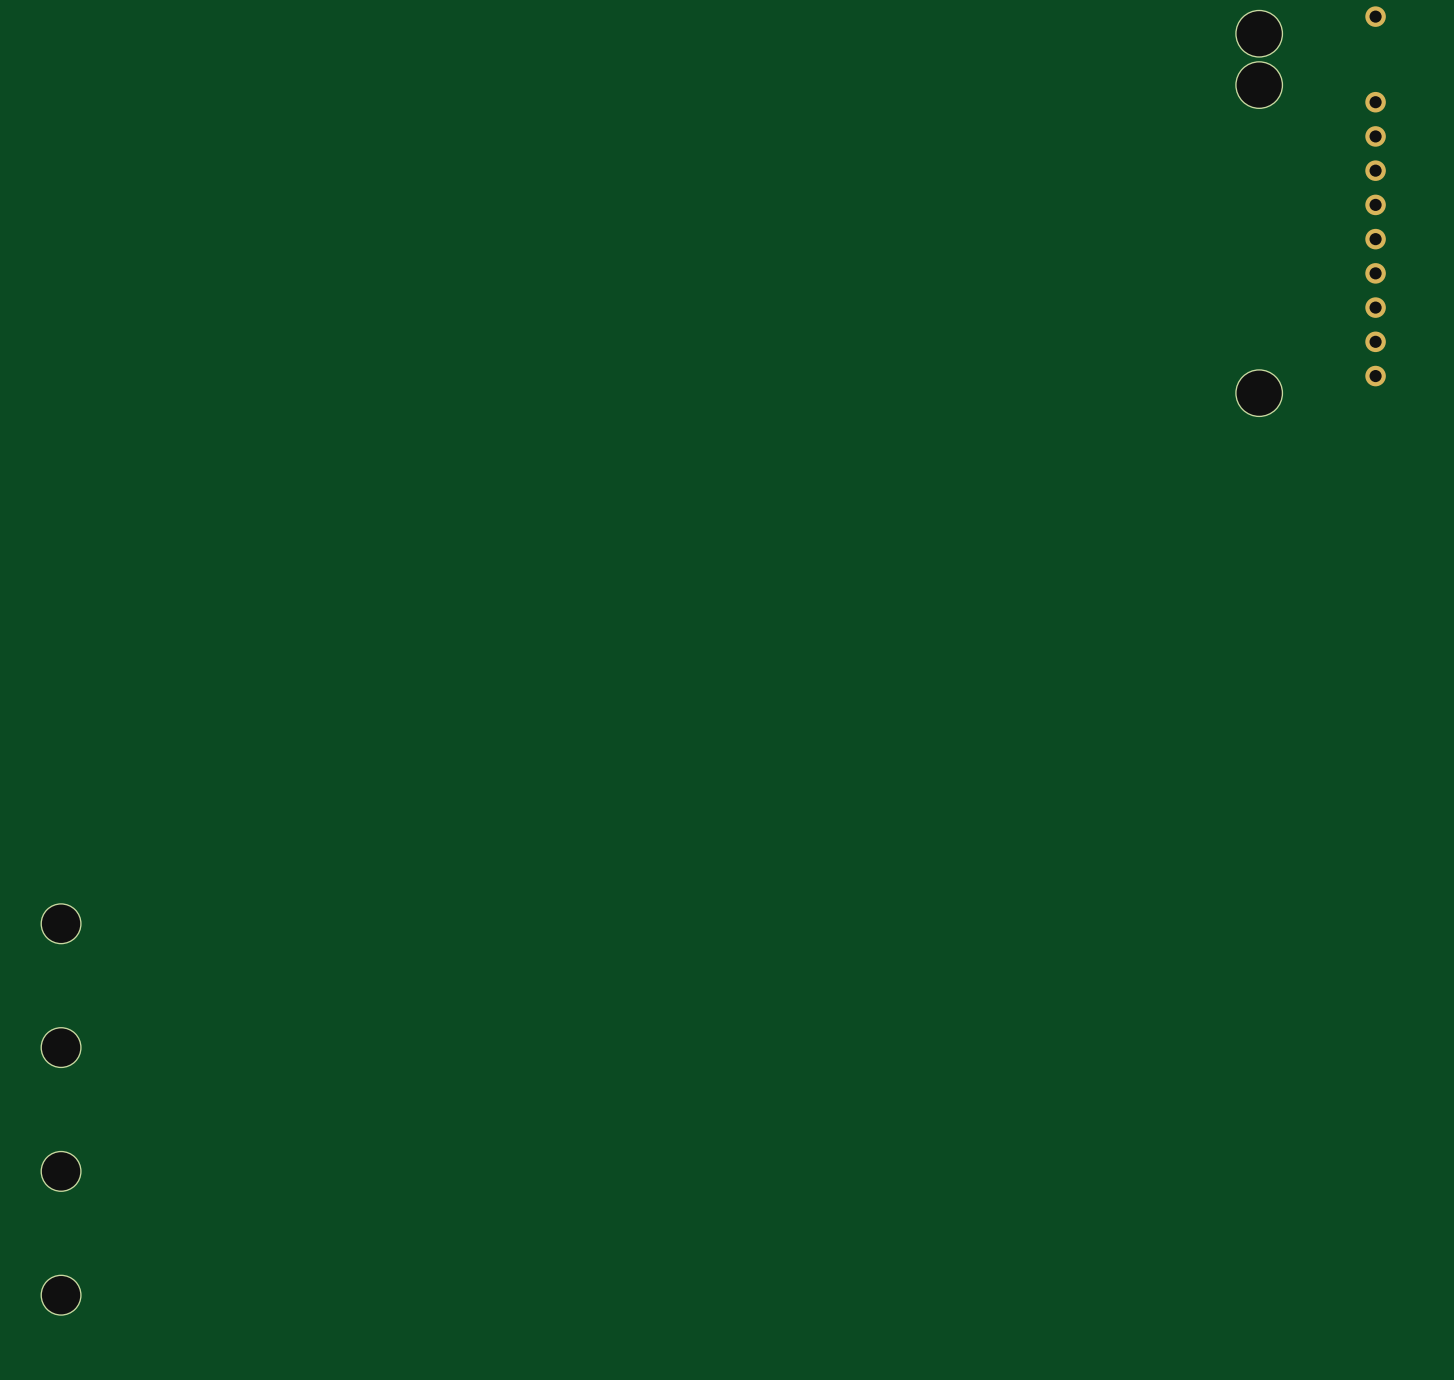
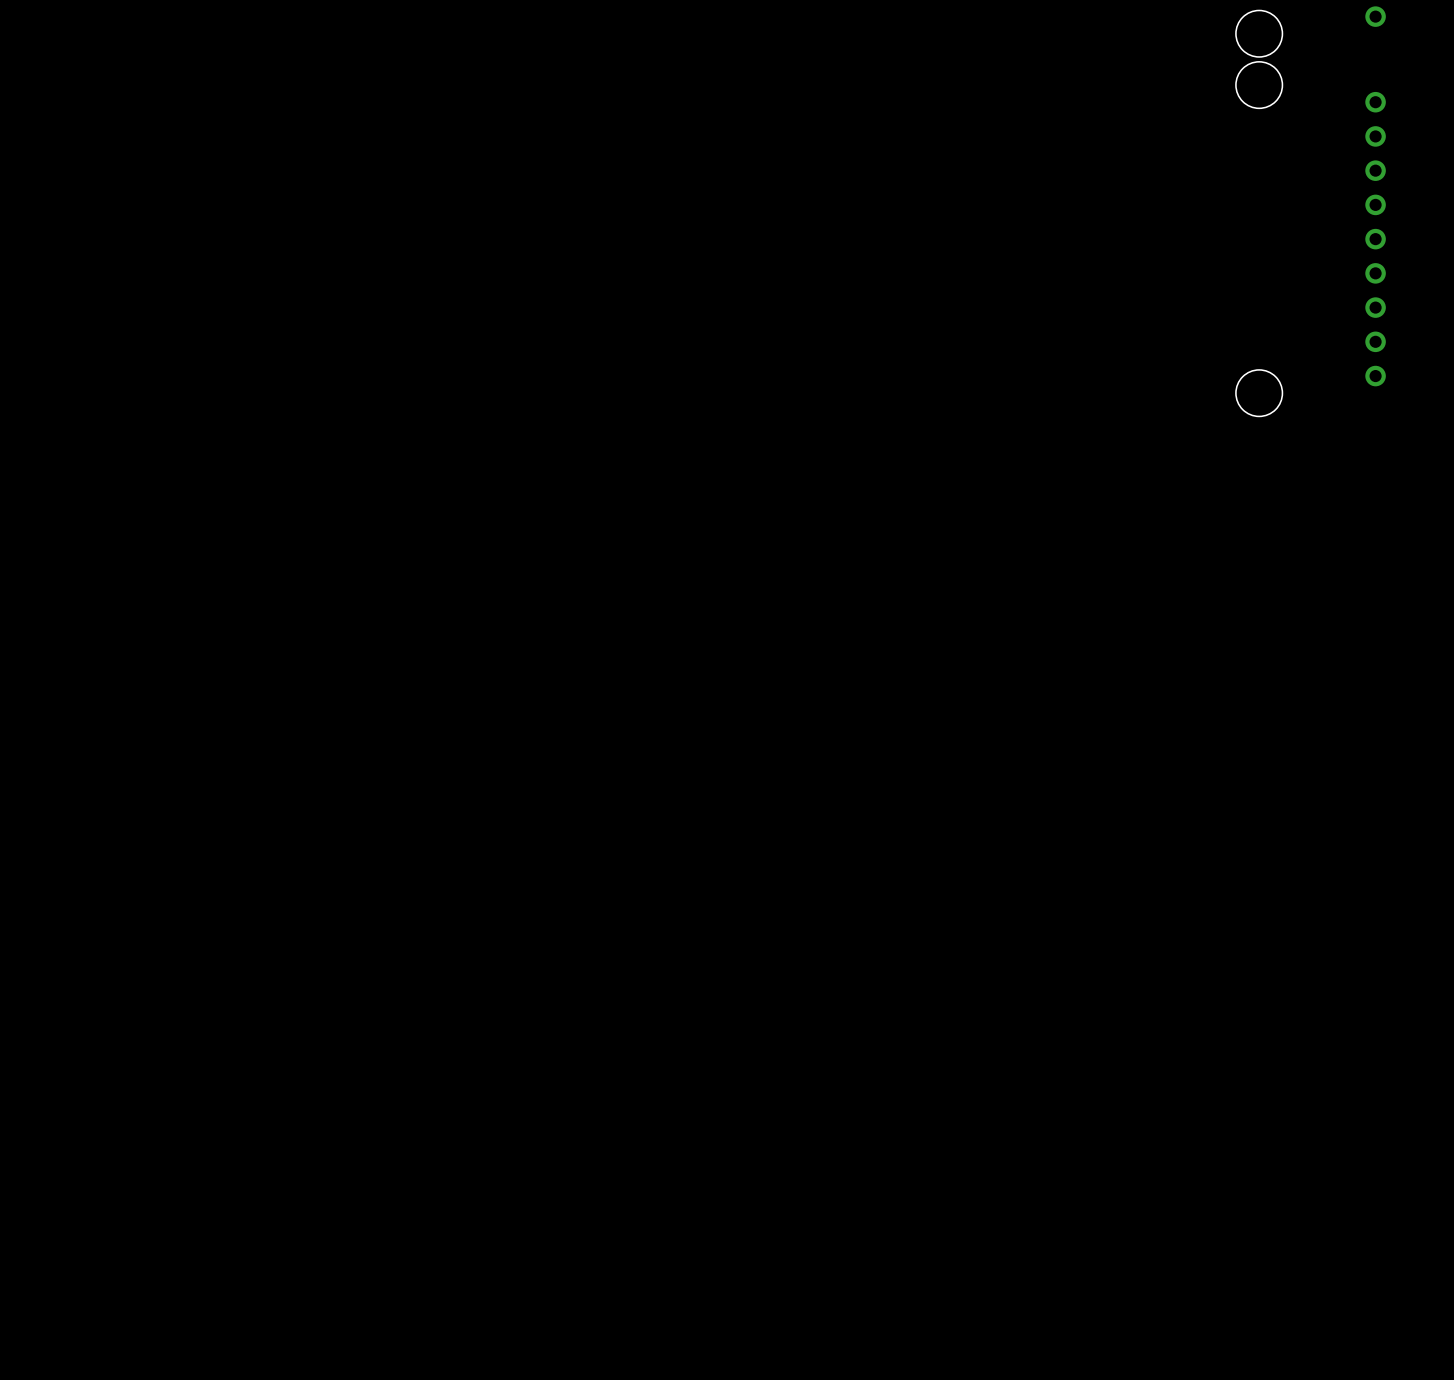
part: (61, 923) -> none
part: (61, 1047) -> none
part: (61, 1171) -> none
part: (61, 1295) -> none

